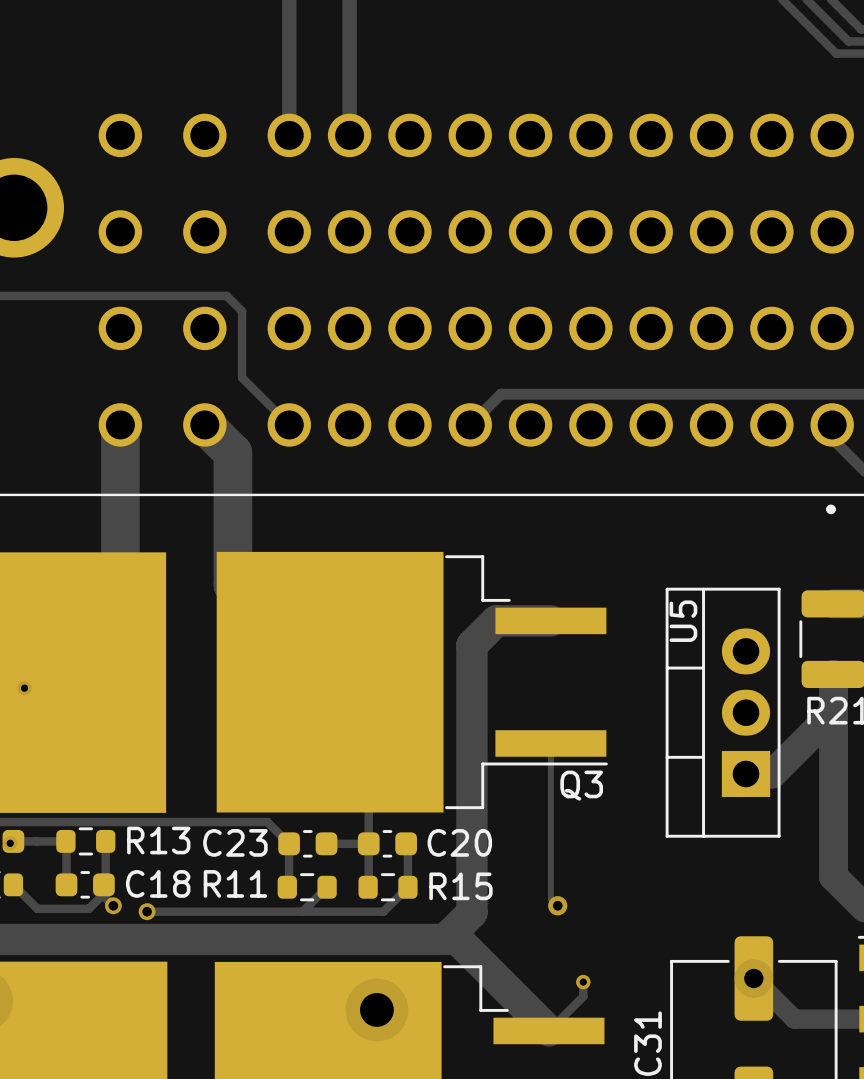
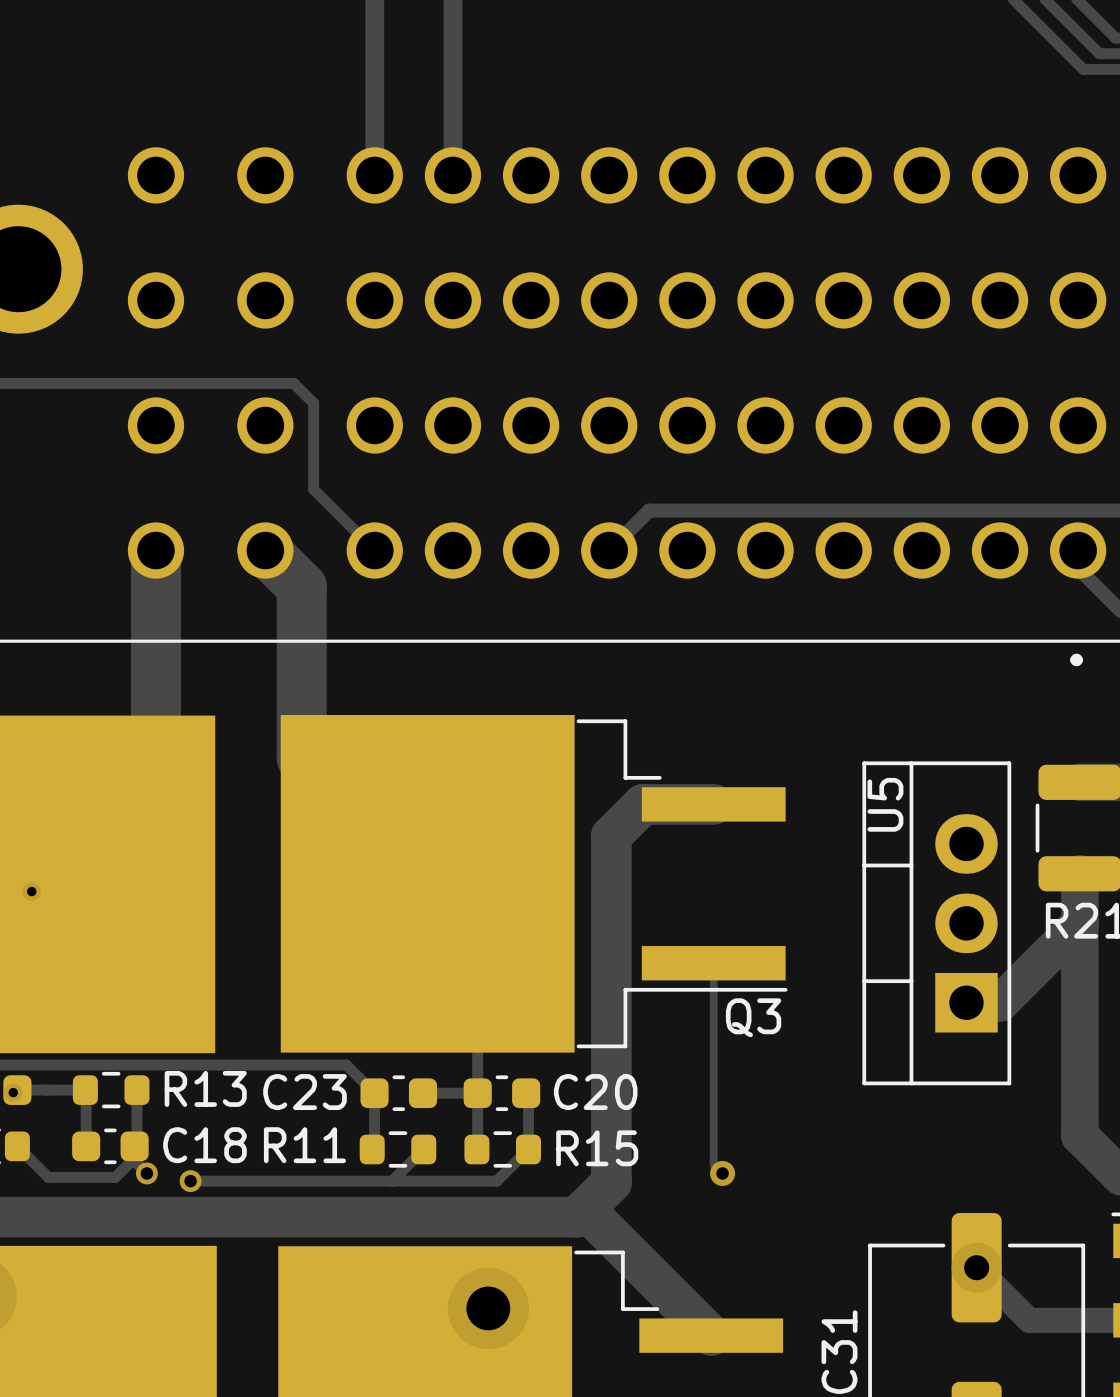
track: (583, 982) (583, 996) (548, 1030) -> none
via: (583, 982) -> none

